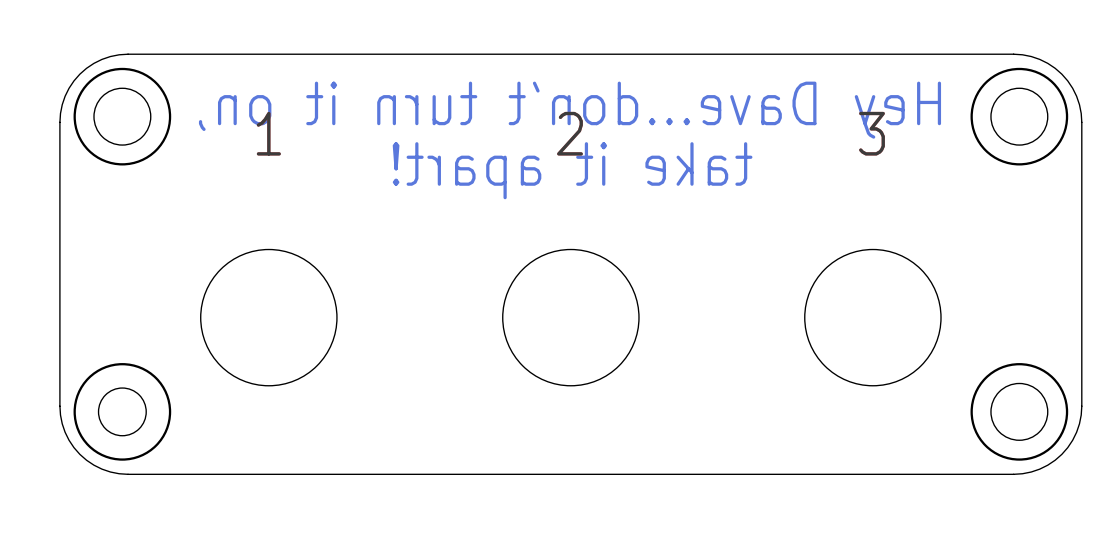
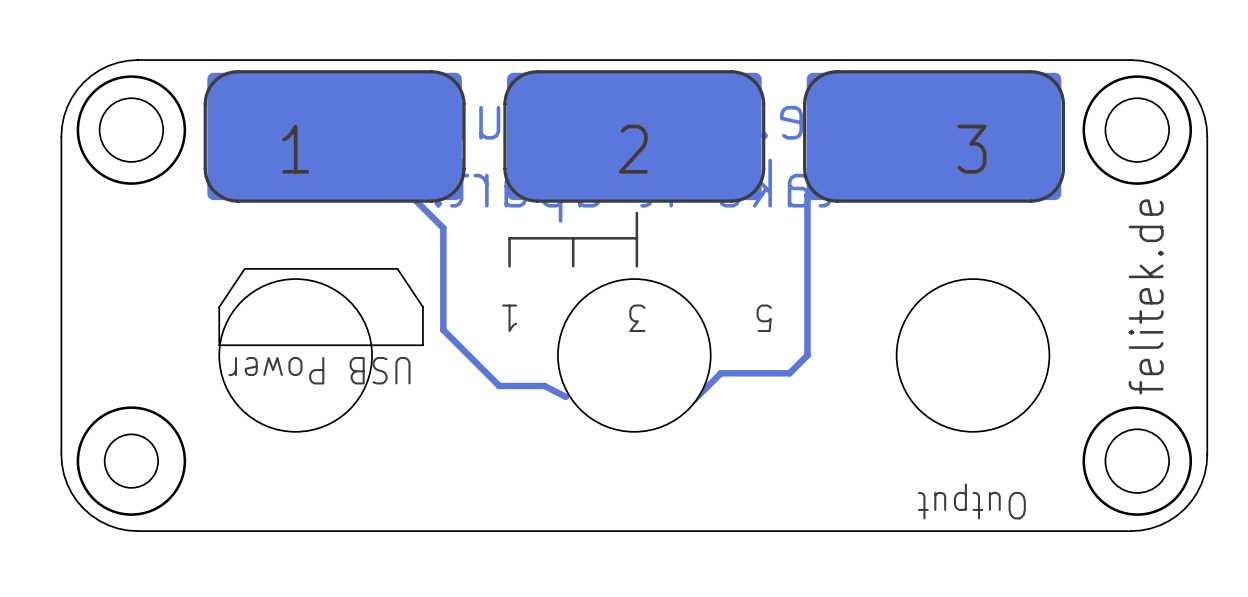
bottom track: none -> (334, 136) (351, 136) (443, 228) (443, 329) (499, 386) (544, 386) (565, 396)
part: none -> (334, 136)
part: none -> (634, 136)
bottom track: none -> (934, 136) (926, 144) (858, 144) (807, 195) (807, 355) (789, 373) (720, 373) (693, 400) (695, 396)
part: none -> (934, 136)
line: none -> (636, 212) (636, 266)
line: none -> (573, 238) (573, 266)
line: none -> (636, 238) (509, 238) (509, 266)
drawing: none -> [219, 268, 423, 346]
text: none -> felitek.de (1146, 296)
text: none -> 1 (509, 318)
text: none -> 3 (637, 318)
text: none -> 5 (764, 318)
text: none -> USB Power (319, 370)
text: none -> Output (971, 501)

